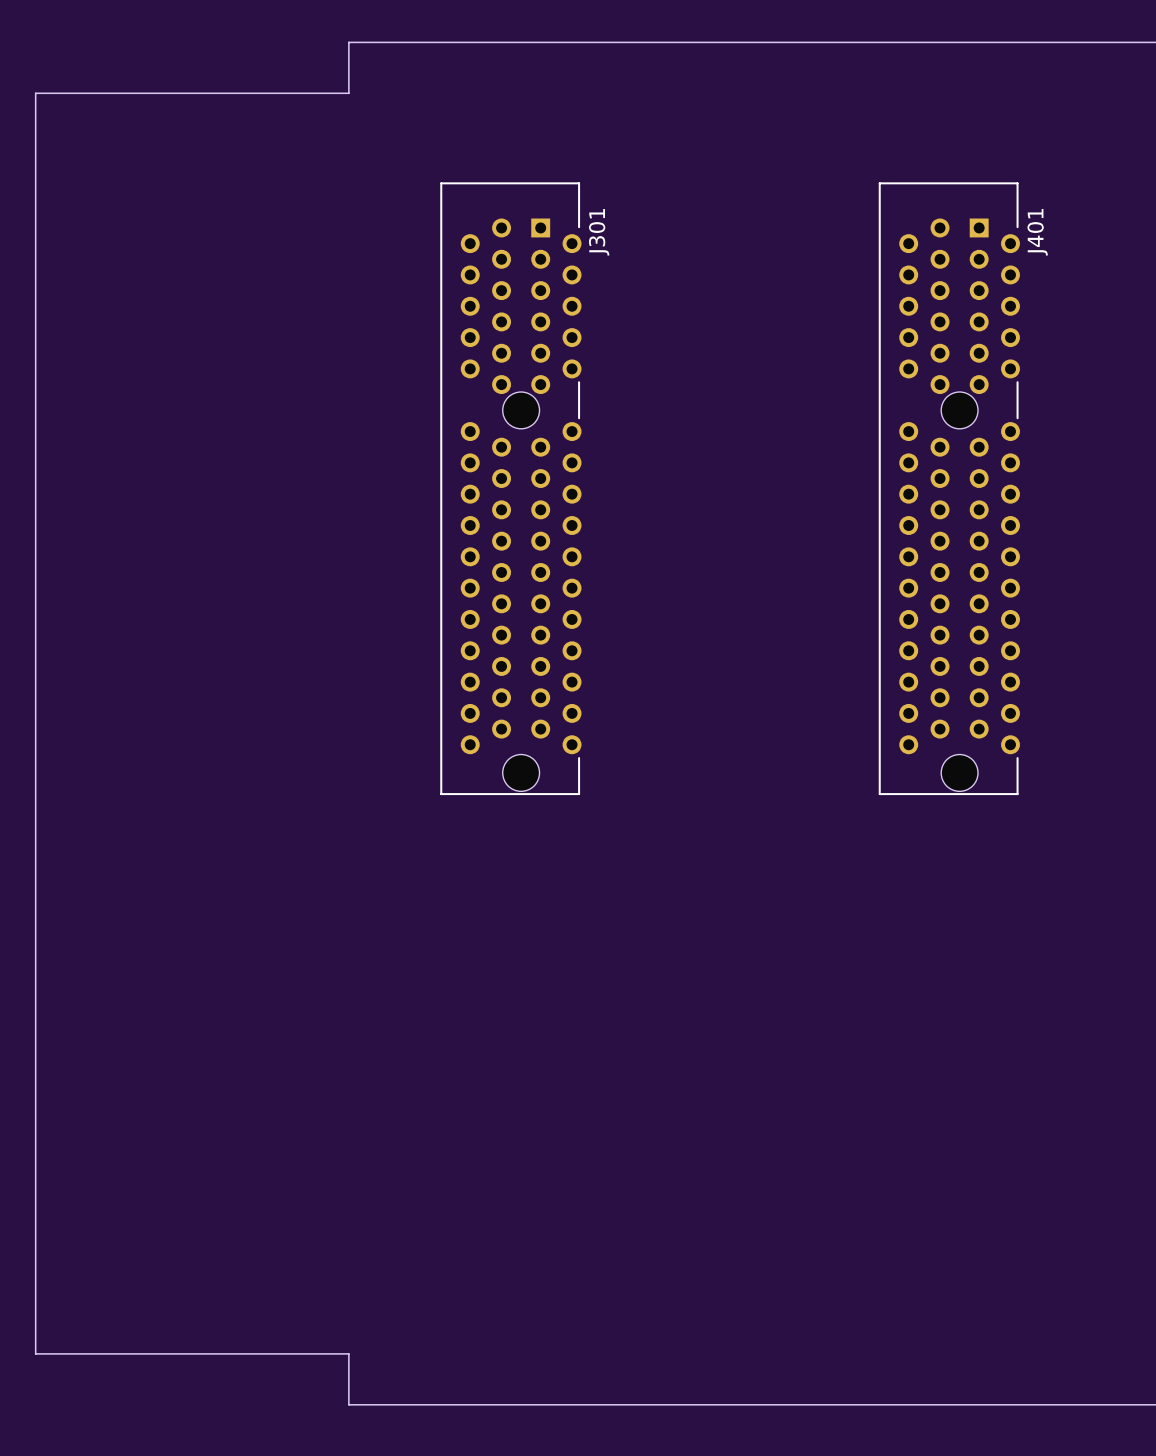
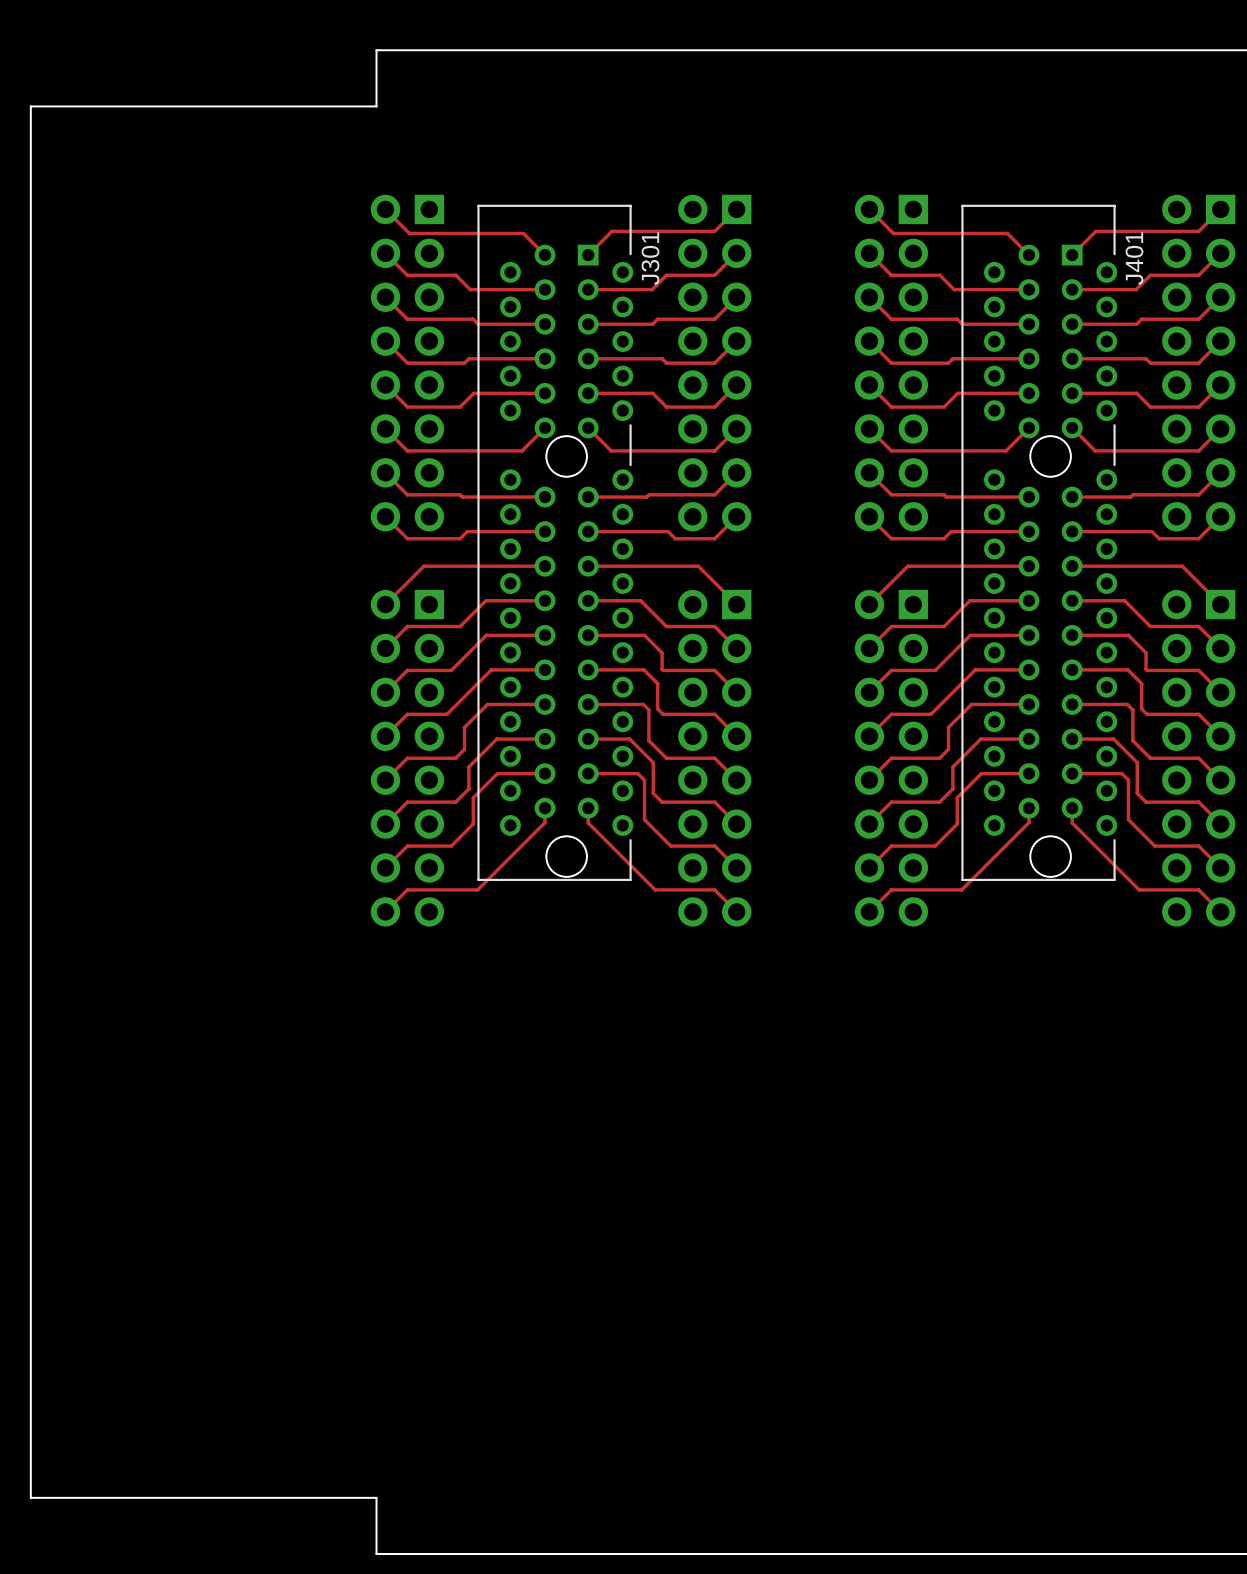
track: none -> (385, 209) (409, 233) (523, 233) (545, 255)
track: none -> (736, 209) (714, 231) (611, 231) (588, 255)
track: none -> (869, 209) (893, 233) (1007, 233) (1029, 255)
track: none -> (1220, 209) (1198, 231) (1095, 231) (1072, 255)
track: none -> (385, 253) (407, 275) (455, 275) (470, 289) (545, 289)
track: none -> (736, 253) (714, 275) (666, 275) (652, 289) (588, 289)
track: none -> (869, 253) (891, 275) (939, 275) (954, 289) (1029, 289)
track: none -> (1220, 253) (1198, 275) (1150, 275) (1136, 289) (1072, 289)
track: none -> (385, 297) (407, 319) (473, 319) (478, 324) (545, 324)
track: none -> (736, 297) (714, 319) (657, 319) (652, 324) (588, 324)
track: none -> (869, 297) (891, 319) (957, 319) (962, 324) (1029, 324)
track: none -> (1220, 297) (1198, 319) (1141, 319) (1136, 324) (1072, 324)
track: none -> (385, 341) (407, 363) (464, 363) (468, 358) (545, 358)
track: none -> (736, 341) (714, 363) (666, 363) (662, 358) (588, 358)
track: none -> (869, 341) (891, 363) (948, 363) (952, 358) (1029, 358)
track: none -> (1220, 341) (1198, 363) (1150, 363) (1146, 358) (1072, 358)
part: none -> (407, 363)
part: none -> (714, 363)
part: none -> (891, 363)
part: none -> (1198, 363)
track: none -> (385, 385) (407, 407) (460, 407) (473, 393) (545, 393)
track: none -> (736, 385) (714, 407) (666, 407) (652, 393) (588, 393)
track: none -> (869, 385) (891, 407) (944, 407) (957, 393) (1029, 393)
track: none -> (1220, 385) (1198, 407) (1150, 407) (1136, 393) (1072, 393)
track: none -> (545, 427) (522, 450) (407, 450) (385, 428)
track: none -> (588, 427) (611, 450) (714, 450) (736, 428)
track: none -> (1029, 427) (1006, 450) (891, 450) (869, 428)
track: none -> (1072, 427) (1095, 450) (1198, 450) (1220, 428)
track: none -> (385, 472) (407, 494) (545, 497)
track: none -> (736, 472) (714, 494) (588, 497)
track: none -> (869, 472) (891, 494) (1029, 497)
track: none -> (1220, 472) (1198, 494) (1072, 497)
track: none -> (385, 516) (407, 538) (460, 538) (467, 531) (545, 531)
track: none -> (736, 516) (714, 538) (675, 538) (668, 531) (588, 531)
track: none -> (869, 516) (891, 538) (944, 538) (951, 531) (1029, 531)
track: none -> (1220, 516) (1198, 538) (1159, 538) (1152, 531) (1072, 531)
track: none -> (545, 566) (423, 566) (385, 604)
track: none -> (588, 566) (698, 566) (736, 604)
track: none -> (1029, 566) (907, 566) (869, 604)
track: none -> (1072, 566) (1182, 566) (1220, 604)
track: none -> (545, 600) (485, 600) (460, 626) (407, 626) (385, 648)
track: none -> (588, 600) (640, 600) (666, 626) (714, 626) (736, 648)
track: none -> (1029, 600) (969, 600) (944, 626) (891, 626) (869, 648)
track: none -> (1072, 600) (1124, 600) (1150, 626) (1198, 626) (1220, 648)
track: none -> (545, 635) (486, 635) (451, 670) (407, 670) (385, 692)
track: none -> (588, 635) (644, 635) (662, 652) (663, 670) (714, 670) (736, 692)
track: none -> (1029, 635) (970, 635) (935, 670) (891, 670) (869, 692)
track: none -> (1072, 635) (1128, 635) (1146, 652) (1147, 670) (1198, 670) (1220, 692)
track: none -> (545, 669) (491, 669) (446, 714) (407, 714) (385, 736)
track: none -> (588, 669) (644, 669) (657, 683) (657, 708) (663, 714) (714, 714) (736, 736)
track: none -> (1029, 669) (975, 669) (930, 714) (891, 714) (869, 736)
track: none -> (1072, 669) (1127, 669) (1141, 683) (1141, 708) (1147, 714) (1198, 714) (1220, 736)
track: none -> (545, 704) (487, 704) (464, 727) (464, 749) (455, 758) (407, 758) (385, 780)
track: none -> (588, 704) (643, 704) (648, 709) (648, 740) (666, 758) (714, 758) (736, 780)
track: none -> (1029, 704) (971, 704) (948, 727) (948, 749) (939, 758) (891, 758) (869, 780)
track: none -> (1072, 704) (1127, 704) (1132, 709) (1132, 740) (1150, 758) (1198, 758) (1220, 780)
track: none -> (545, 739) (496, 739) (468, 767) (468, 788) (455, 802) (407, 802) (385, 824)
track: none -> (588, 739) (629, 739) (653, 762) (653, 793) (662, 802) (714, 802) (736, 824)
track: none -> (1029, 739) (980, 739) (952, 767) (952, 788) (939, 802) (891, 802) (869, 824)
track: none -> (1072, 739) (1113, 739) (1137, 762) (1137, 793) (1146, 802) (1198, 802) (1220, 824)
part: none -> (407, 758)
part: none -> (714, 758)
part: none -> (891, 758)
part: none -> (1198, 758)
track: none -> (545, 773) (497, 773) (473, 797) (473, 824) (451, 846) (407, 846) (385, 867)
track: none -> (588, 773) (637, 773) (644, 780) (644, 819) (670, 846) (714, 846) (736, 867)
track: none -> (1029, 773) (981, 773) (957, 797) (957, 824) (935, 846) (891, 846) (869, 867)
track: none -> (1072, 773) (1121, 773) (1128, 780) (1128, 819) (1154, 846) (1198, 846) (1220, 867)
track: none -> (545, 808) (545, 822) (477, 889) (407, 889) (385, 911)
track: none -> (588, 808) (588, 822) (655, 889) (714, 889) (736, 911)
track: none -> (1029, 808) (1029, 822) (961, 889) (891, 889) (869, 911)
track: none -> (1072, 808) (1072, 822) (1139, 889) (1198, 889) (1220, 911)

